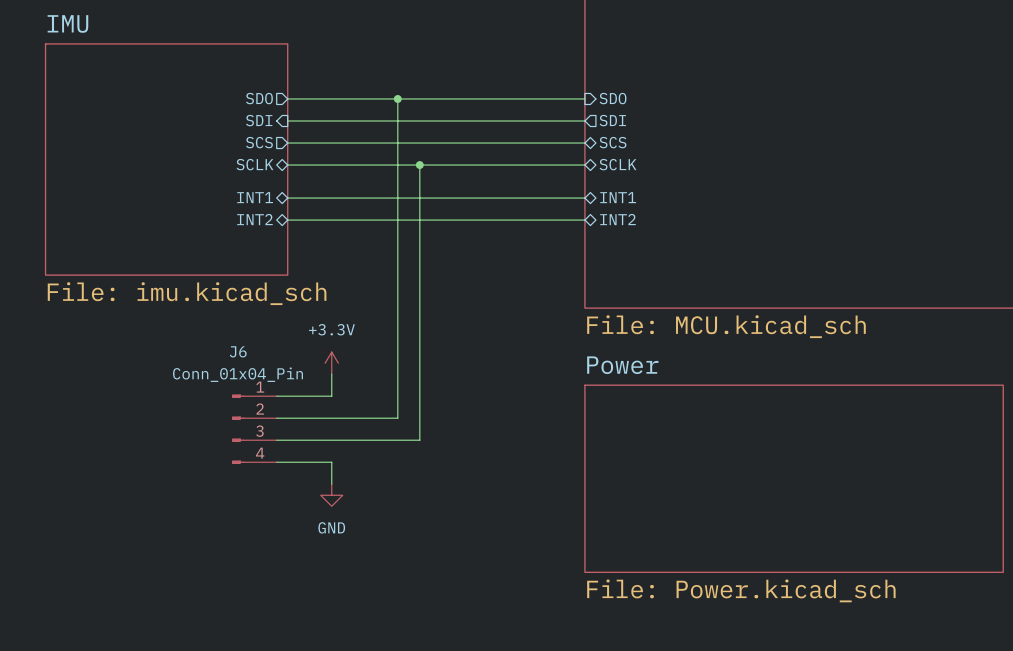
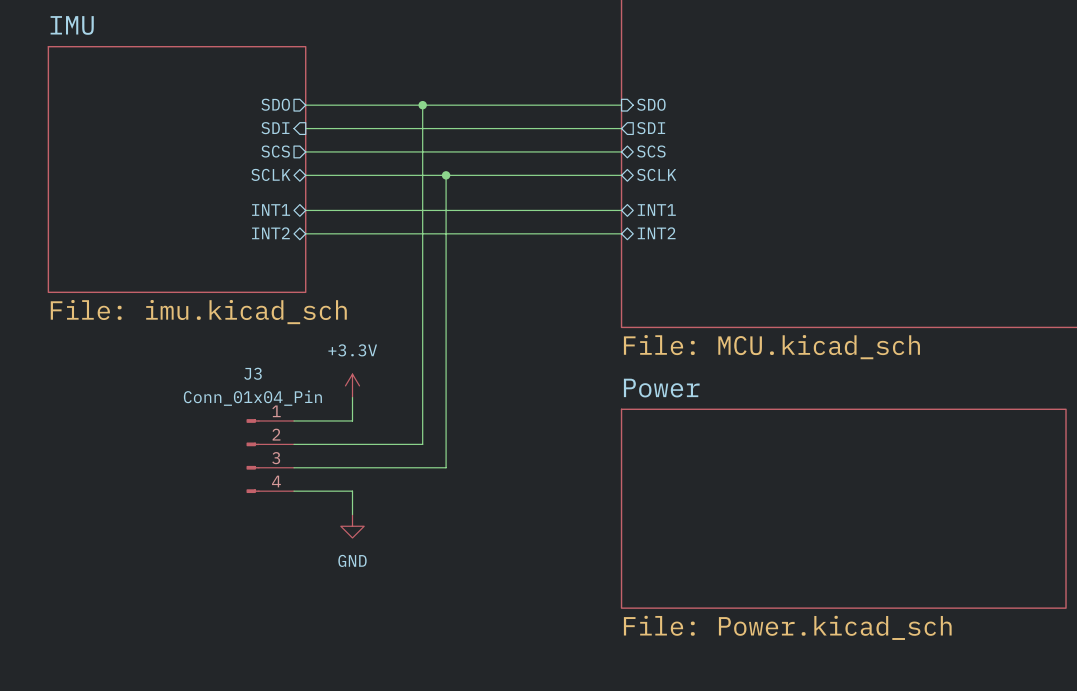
J6 name: J6 (238, 351) -> J3 (253, 373)

